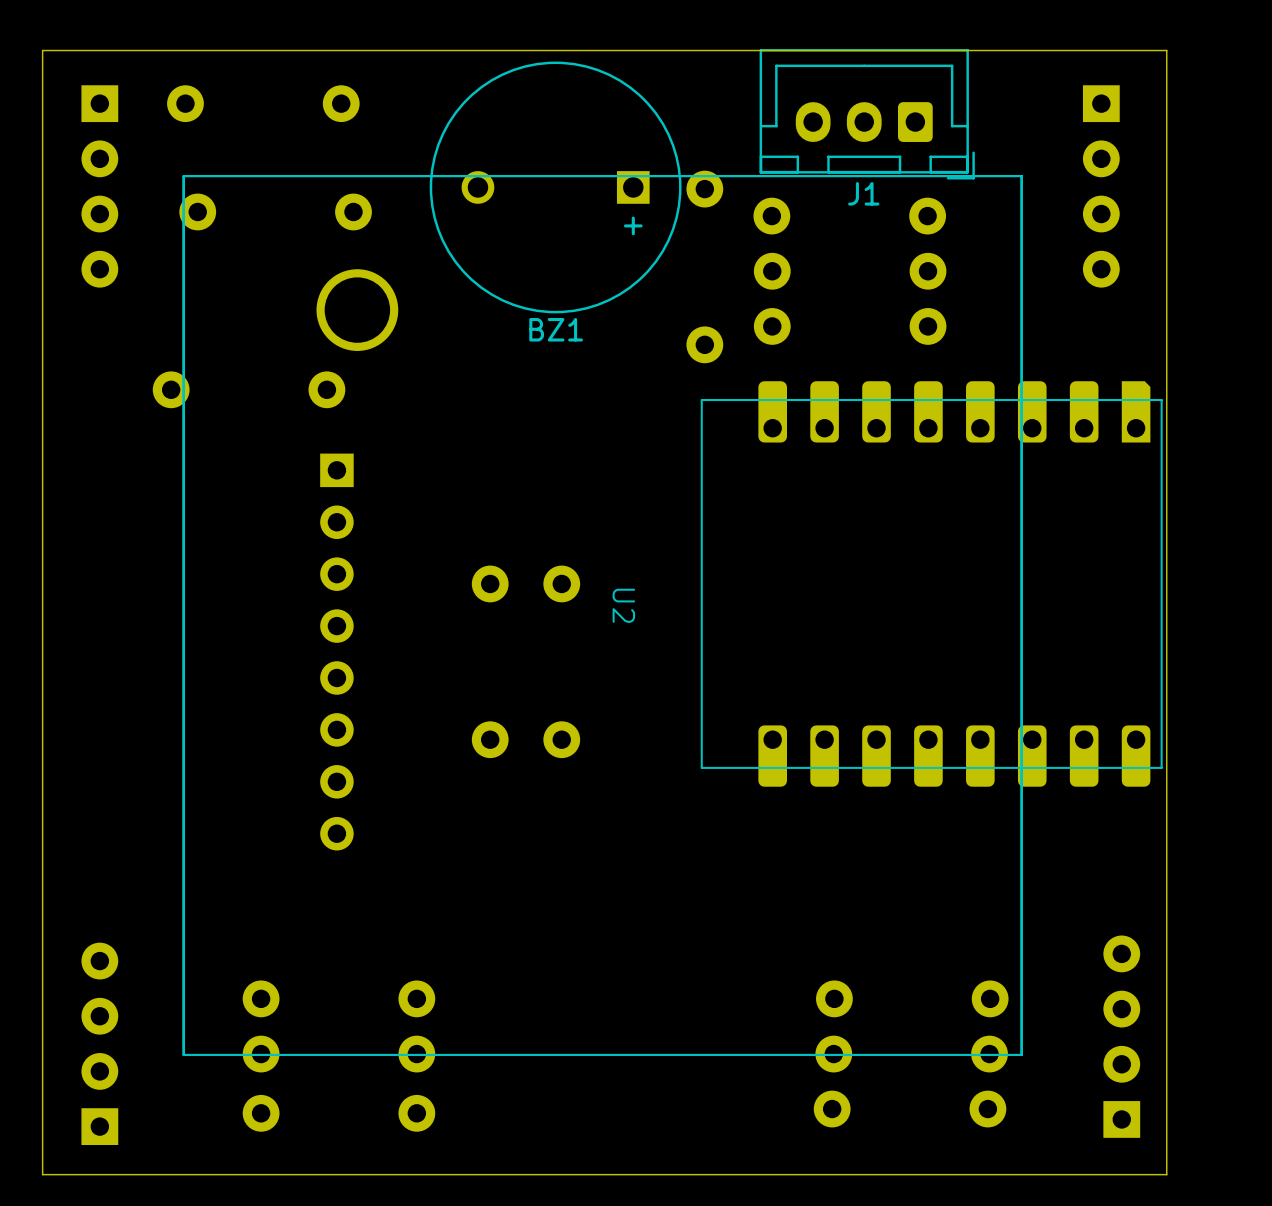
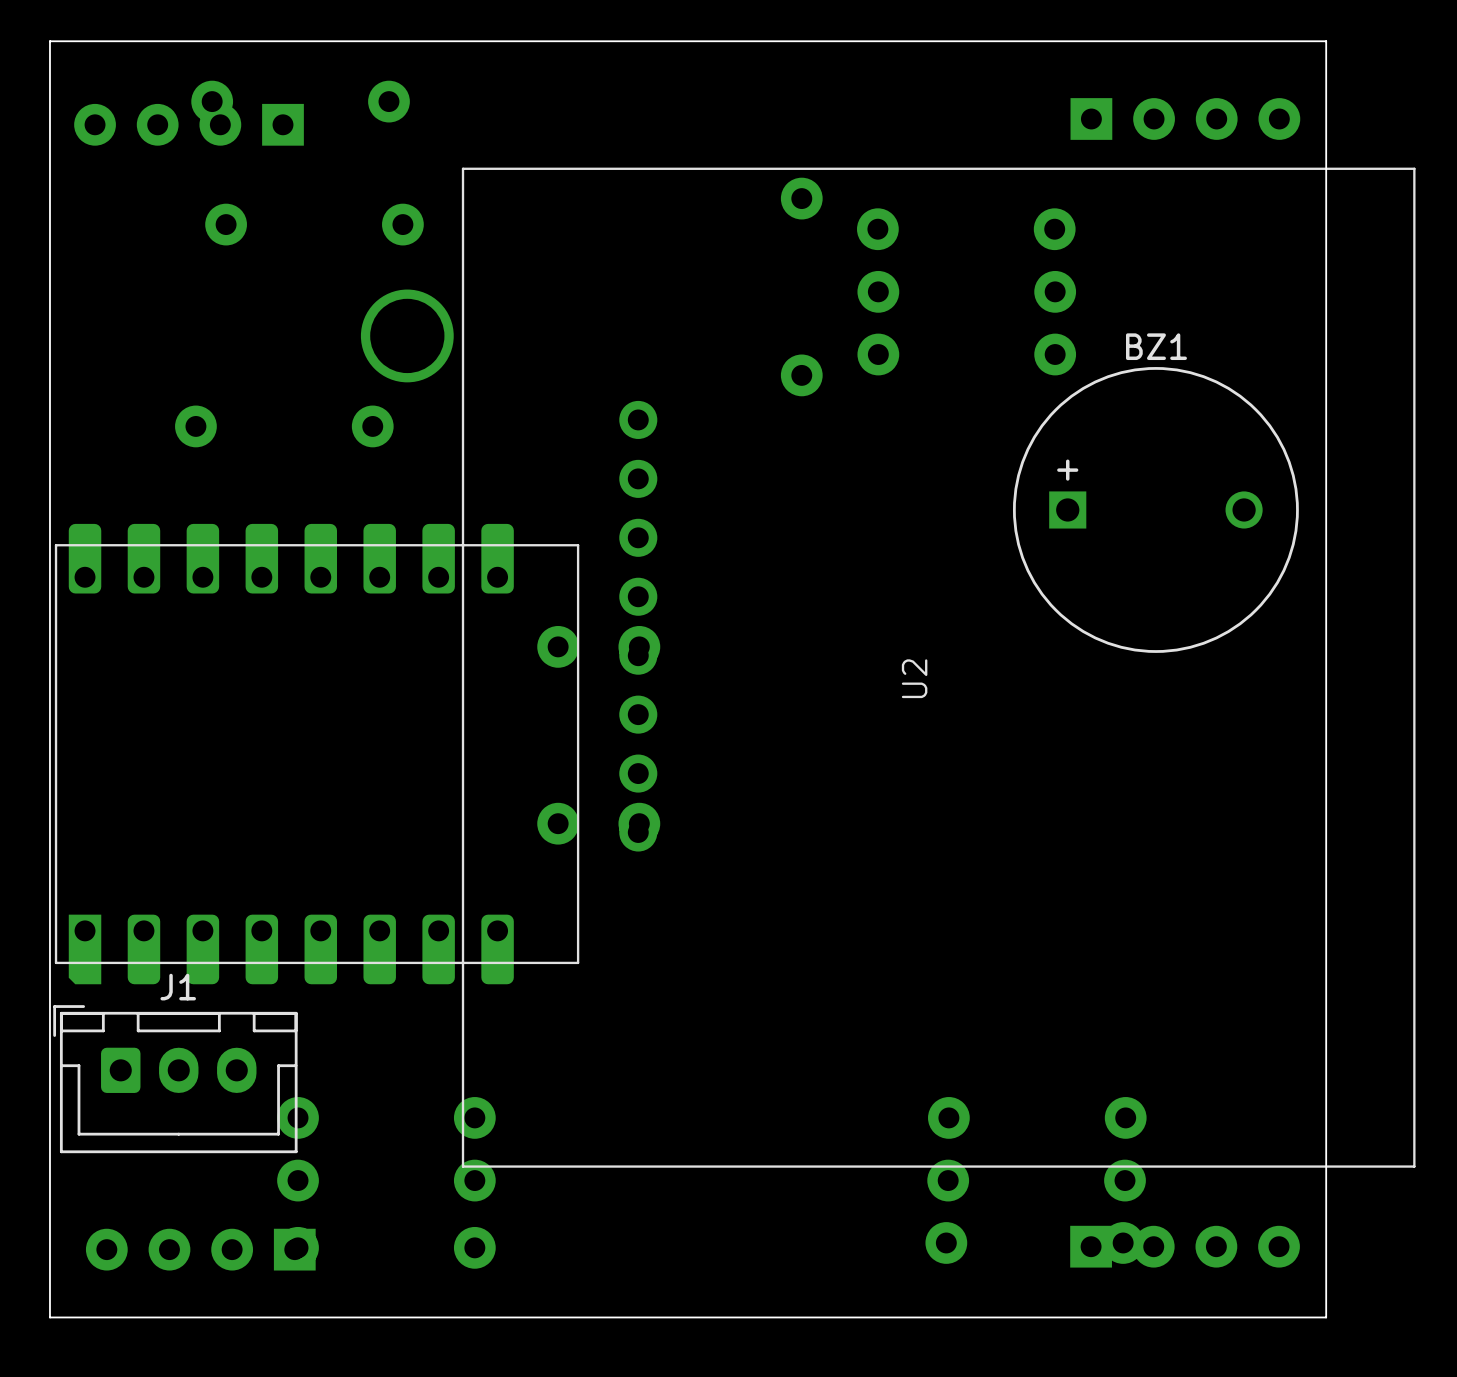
J1 rotation: 0° (867, 114) -> 180° (175, 1079)
J1 position: (867, 114) -> (175, 1079)
U2 footprint: [182, 175, 1023, 1056] -> [461, 167, 1416, 1168]
part rotation: 0° (99, 186) -> 90° clockwise (189, 124)
part rotation: 0° (1101, 186) -> 90° counterclockwise (1185, 118)
BZ1 rotation: 0° (555, 187) -> 180° (1155, 509)
BZ1 position: (555, 187) -> (1155, 509)
part: (931, 583) -> none
U2 name position: U2 (623, 605) -> U2 (914, 678)
part: none -> (317, 754)
part rotation: 0° (1121, 1036) -> 90° clockwise (1185, 1246)
part rotation: 0° (99, 1043) -> 90° counterclockwise (200, 1249)

